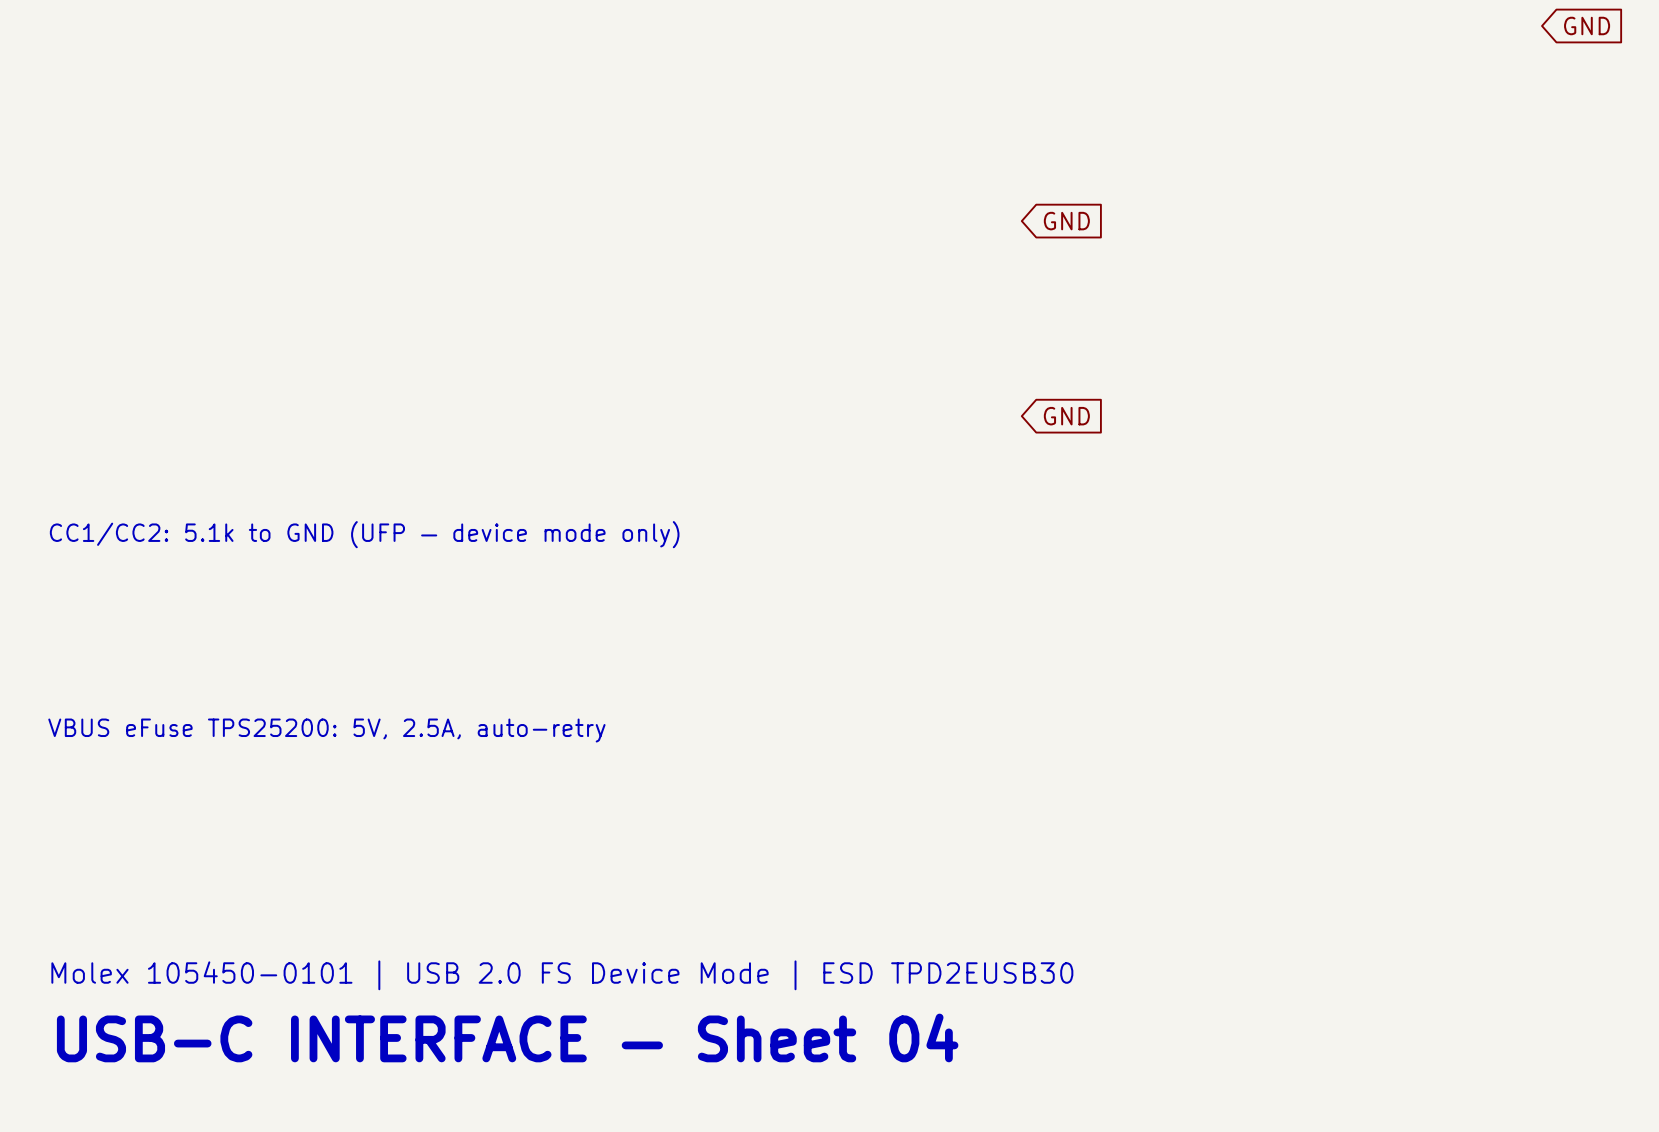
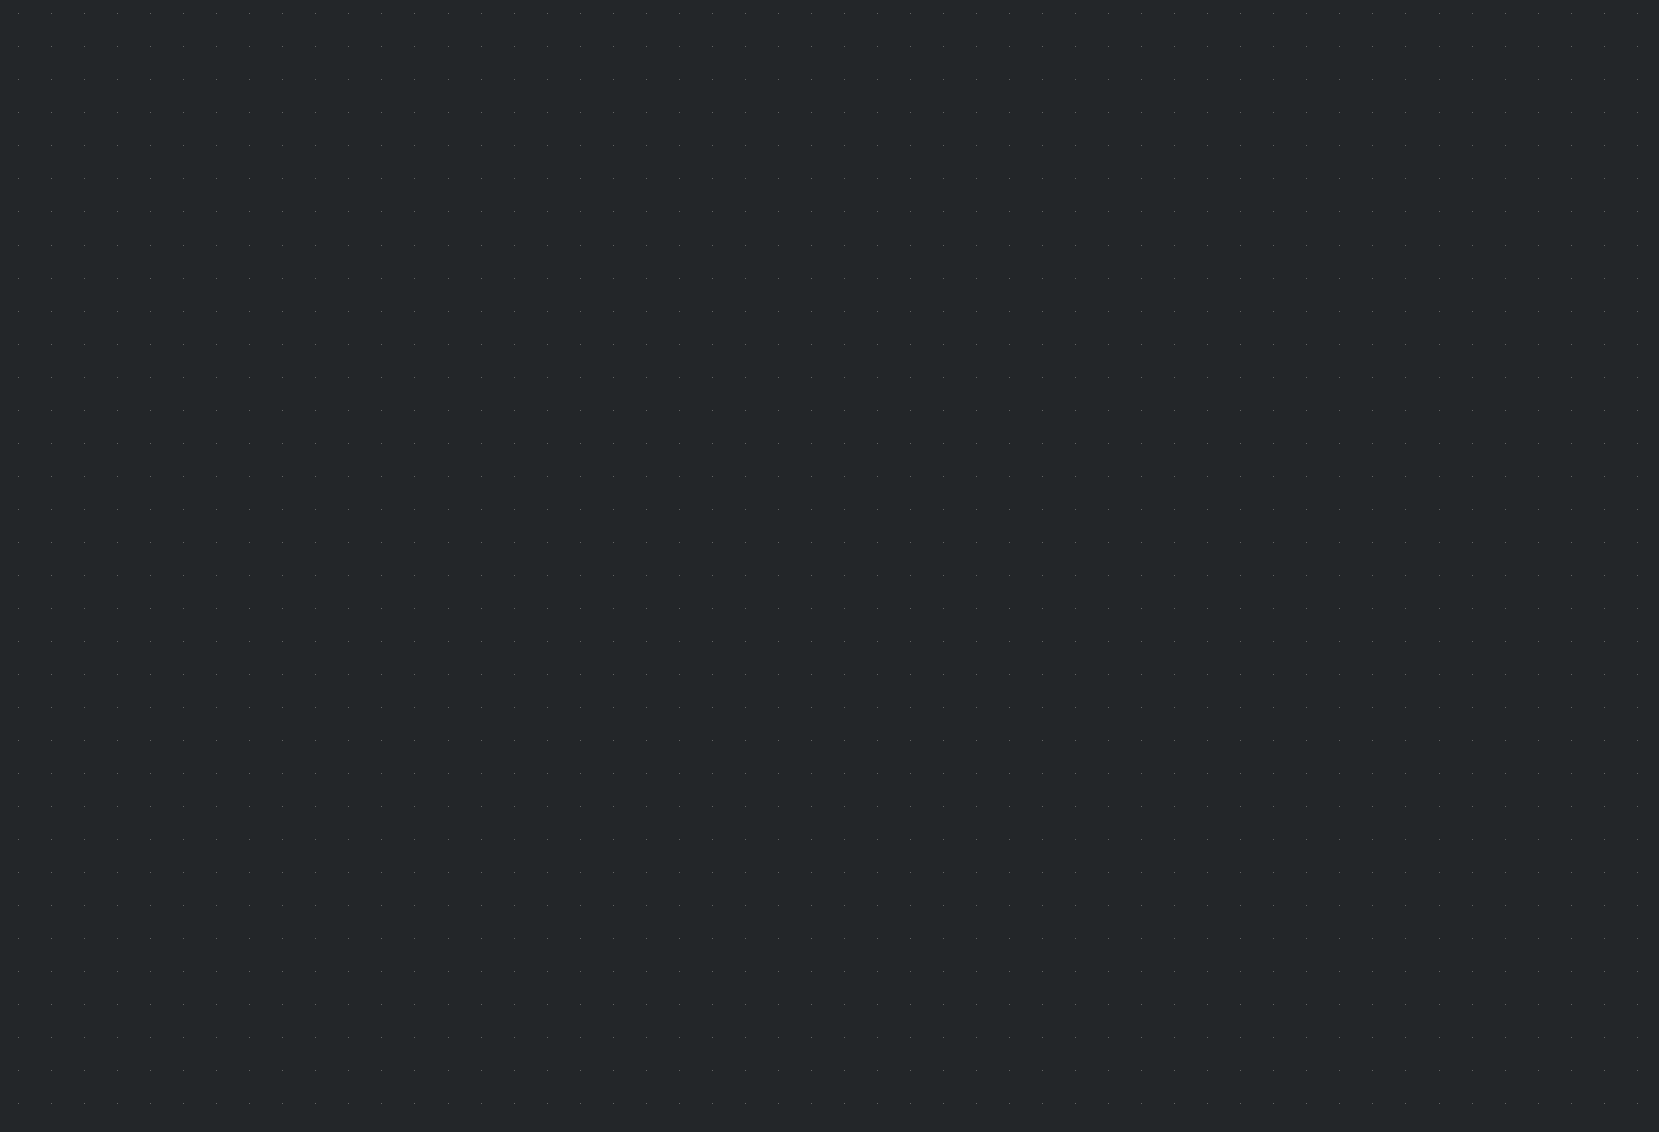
global label: GND (1587, 26) -> none
global label: GND (1066, 221) -> none
global label: GND (1066, 416) -> none
text: CC1/CC2: 5.1k to GND (UFP — device mode only) (364, 534) -> none
text: VBUS eFuse TPS25200: 5V, 2.5A, auto-retry (326, 730) -> none
text: Molex 105450-0101 | USB 2.0 FS Device Mode | ESD TPD2EUSB30 (562, 975) -> none
text: USB-C INTERFACE — Sheet 04 (507, 1037) -> none

